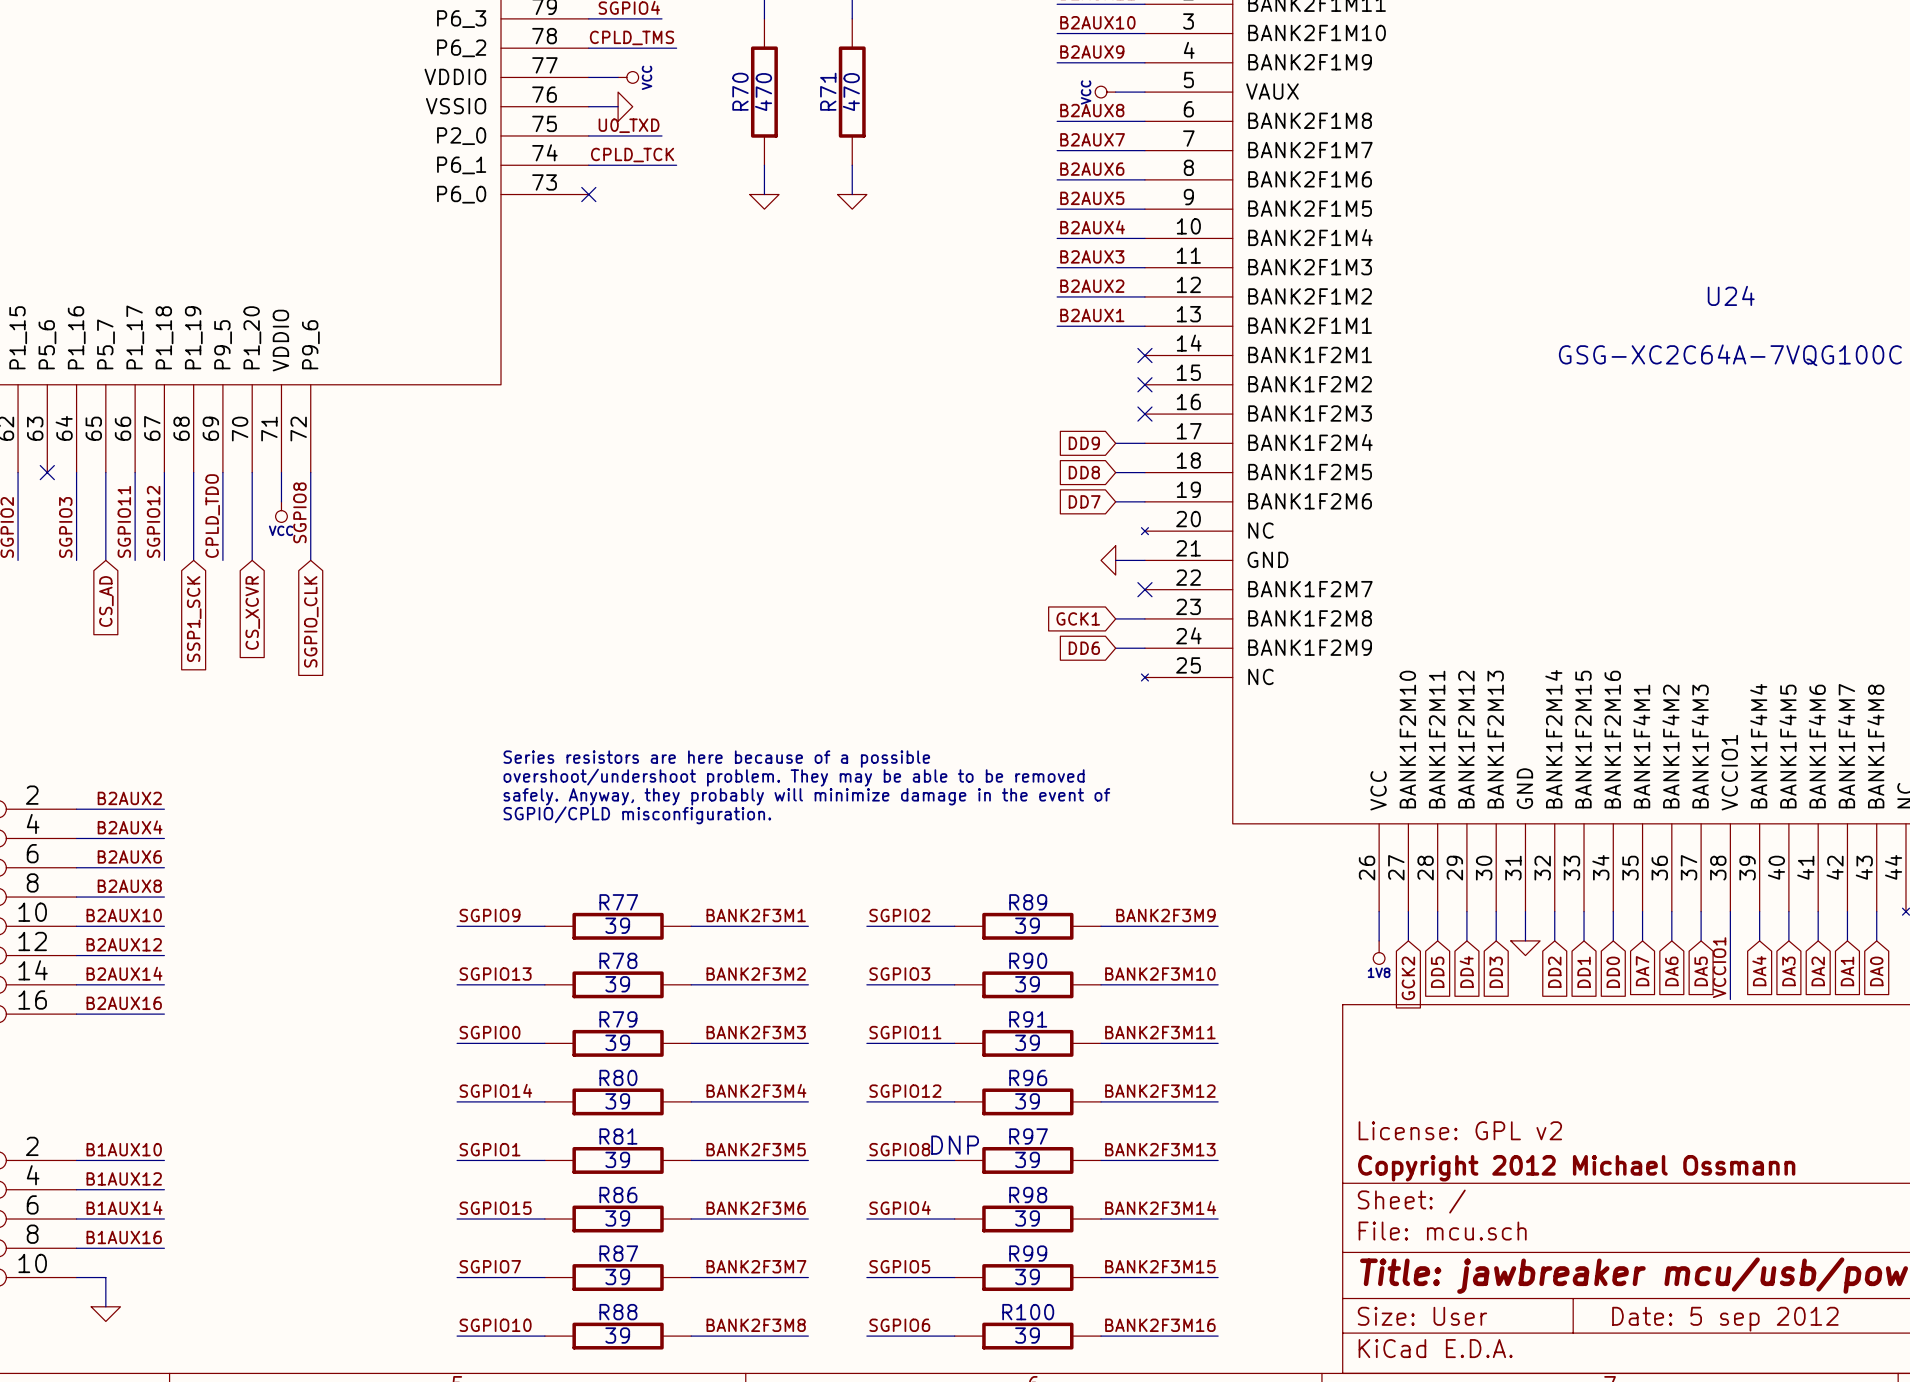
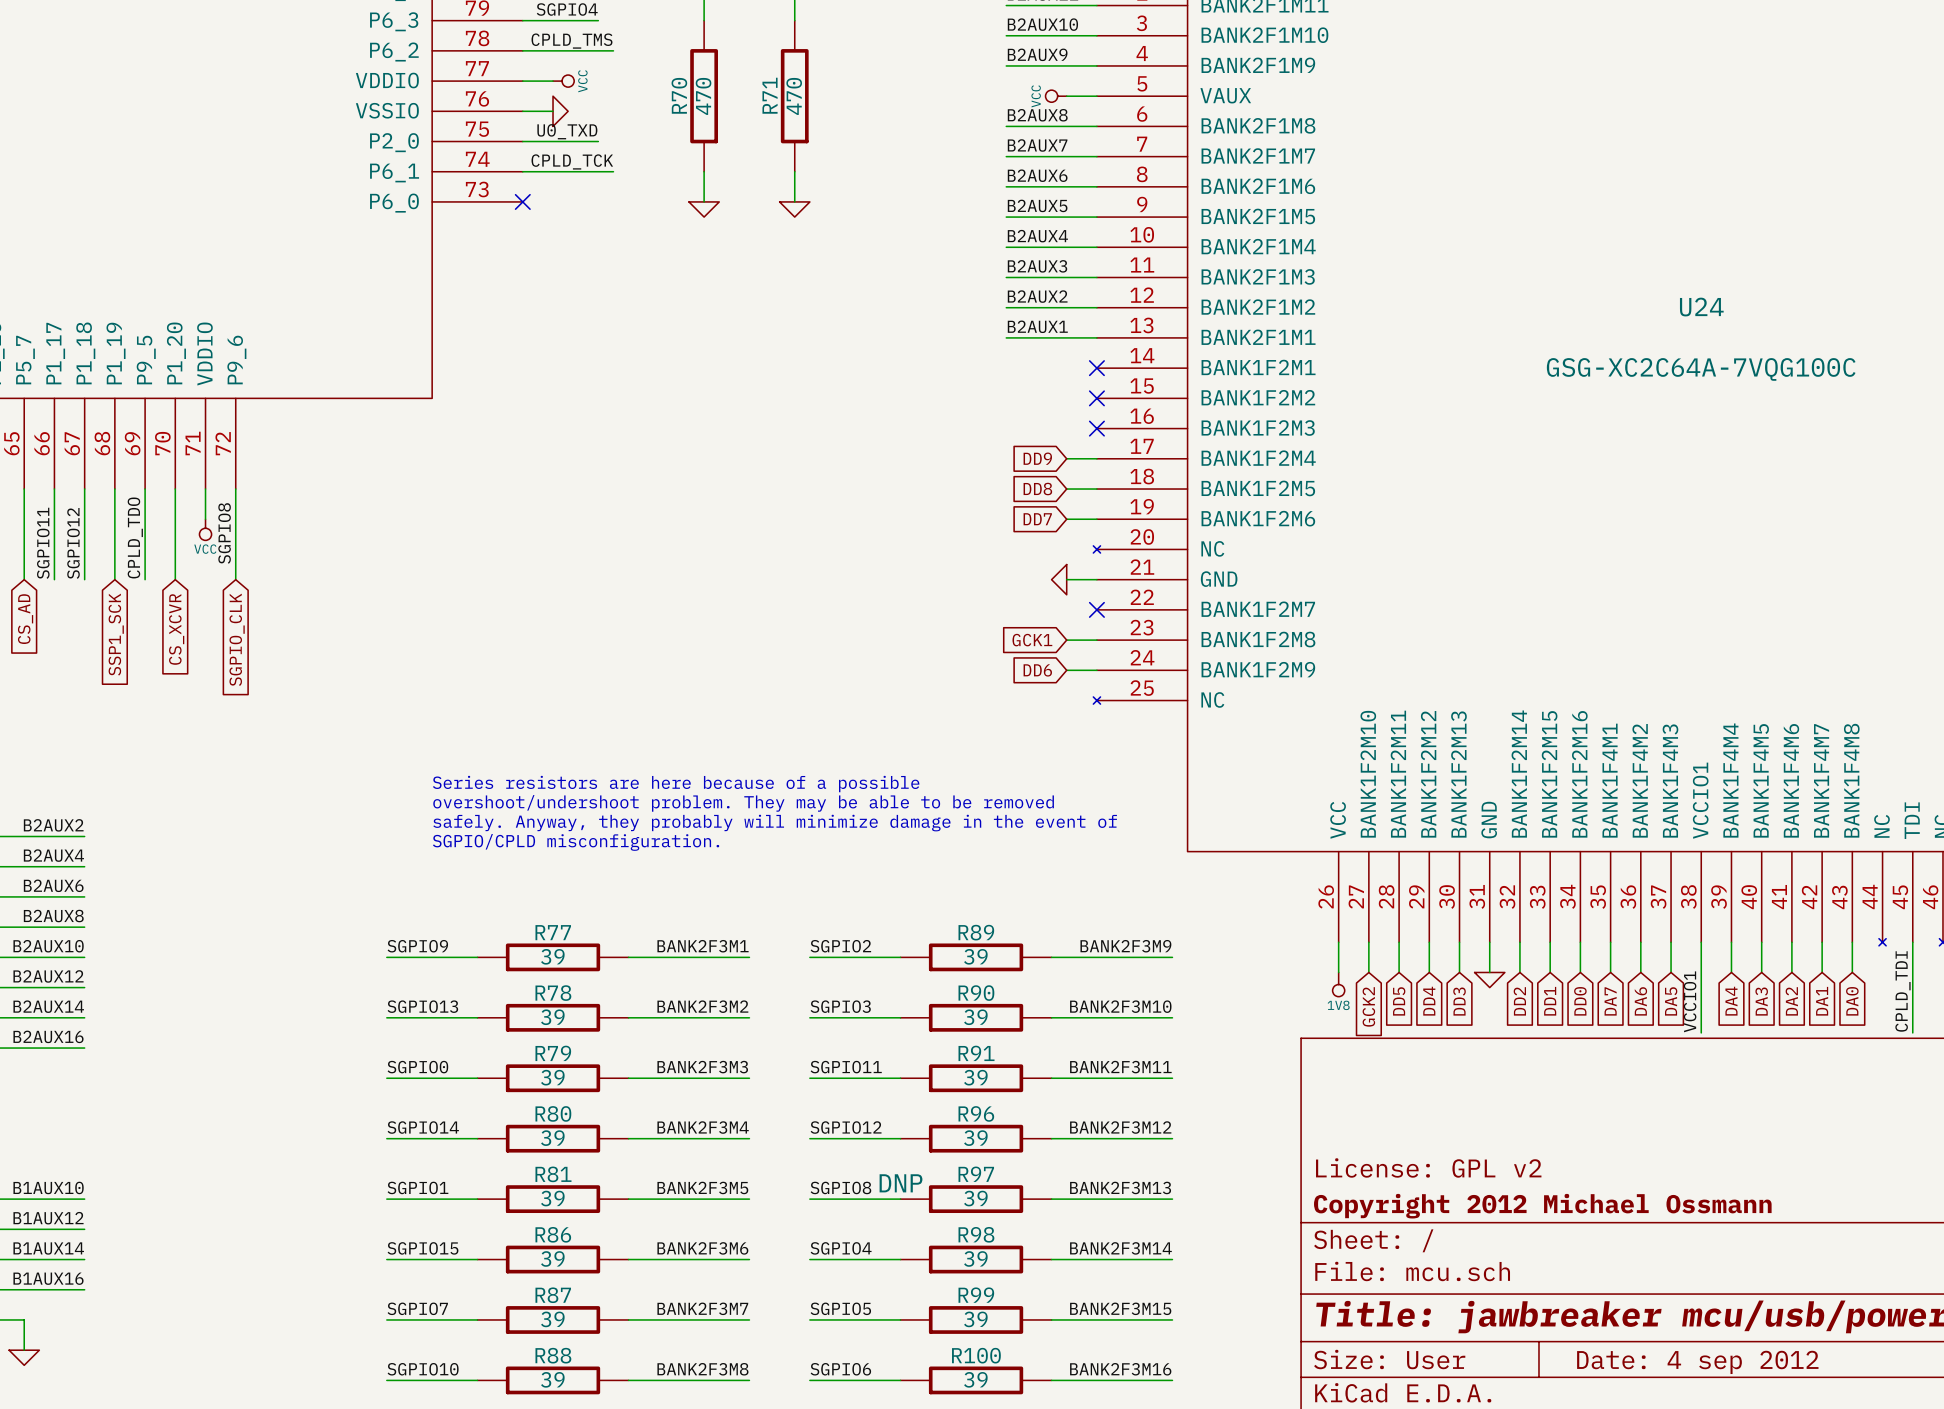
title block: Date: 5 sep 2012 (1725, 1319) -> Date: 4 sep 2012 (1697, 1362)

